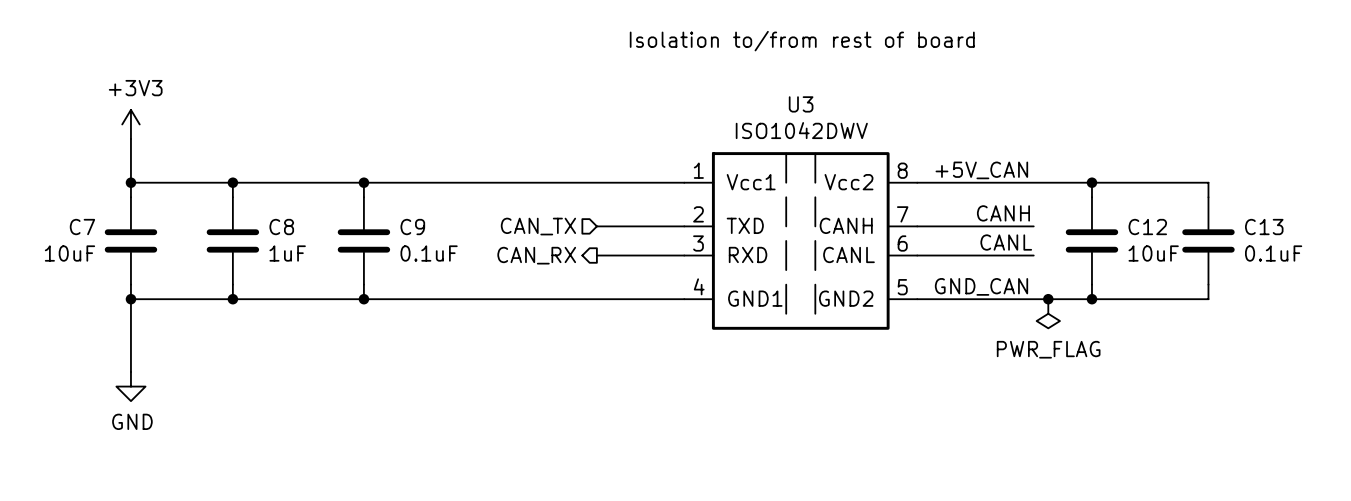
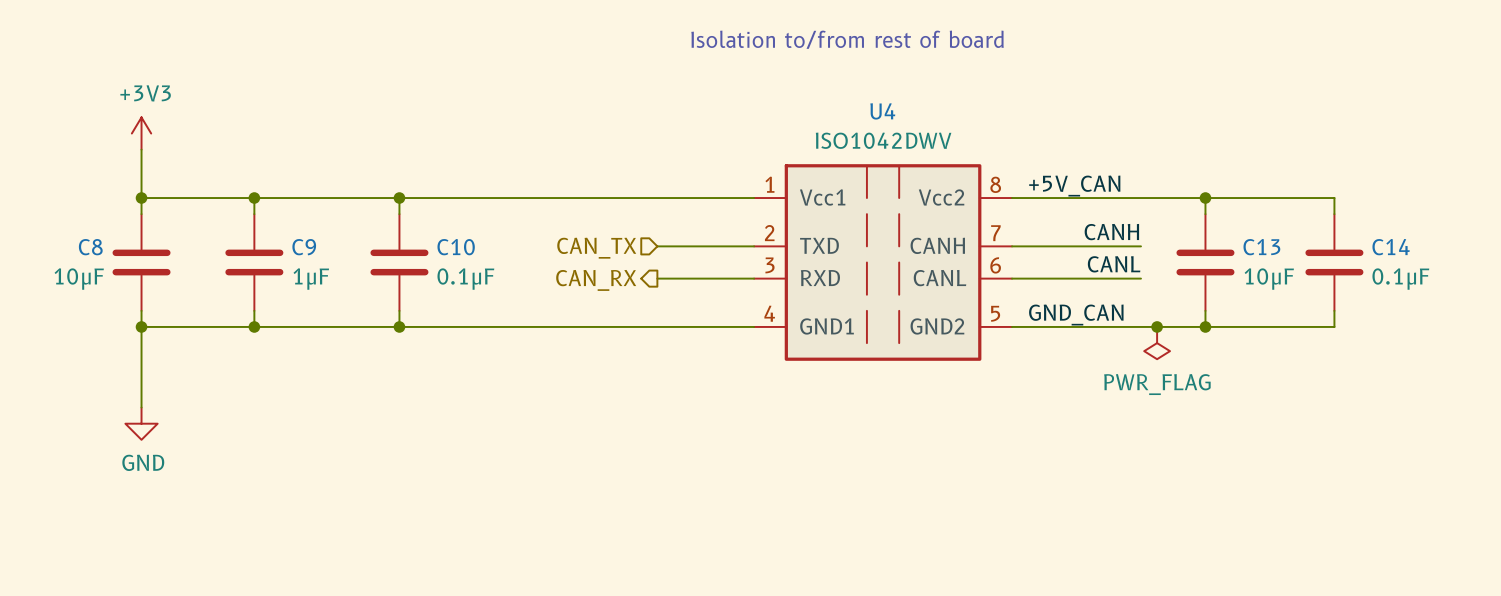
U3 name: U3 (801, 104) -> U4 (882, 111)
C7 name: C7 (82, 227) -> C8 (90, 247)
C8 name: C8 (281, 227) -> C9 (304, 247)
C9 name: C9 (412, 227) -> C10 (456, 247)
C12 name: C12 (1147, 227) -> C13 (1261, 247)
C13 name: C13 (1264, 227) -> C14 (1391, 247)
C7 value: 10uF (69, 253) -> 10μF (79, 279)
C8 value: 1uF (287, 253) -> 1μF (311, 279)
C9 value: 0.1uF (429, 253) -> 0.1μF (465, 279)
C12 value: 10uF (1153, 253) -> 10μF (1269, 279)
C13 value: 0.1uF (1273, 253) -> 0.1μF (1400, 279)

